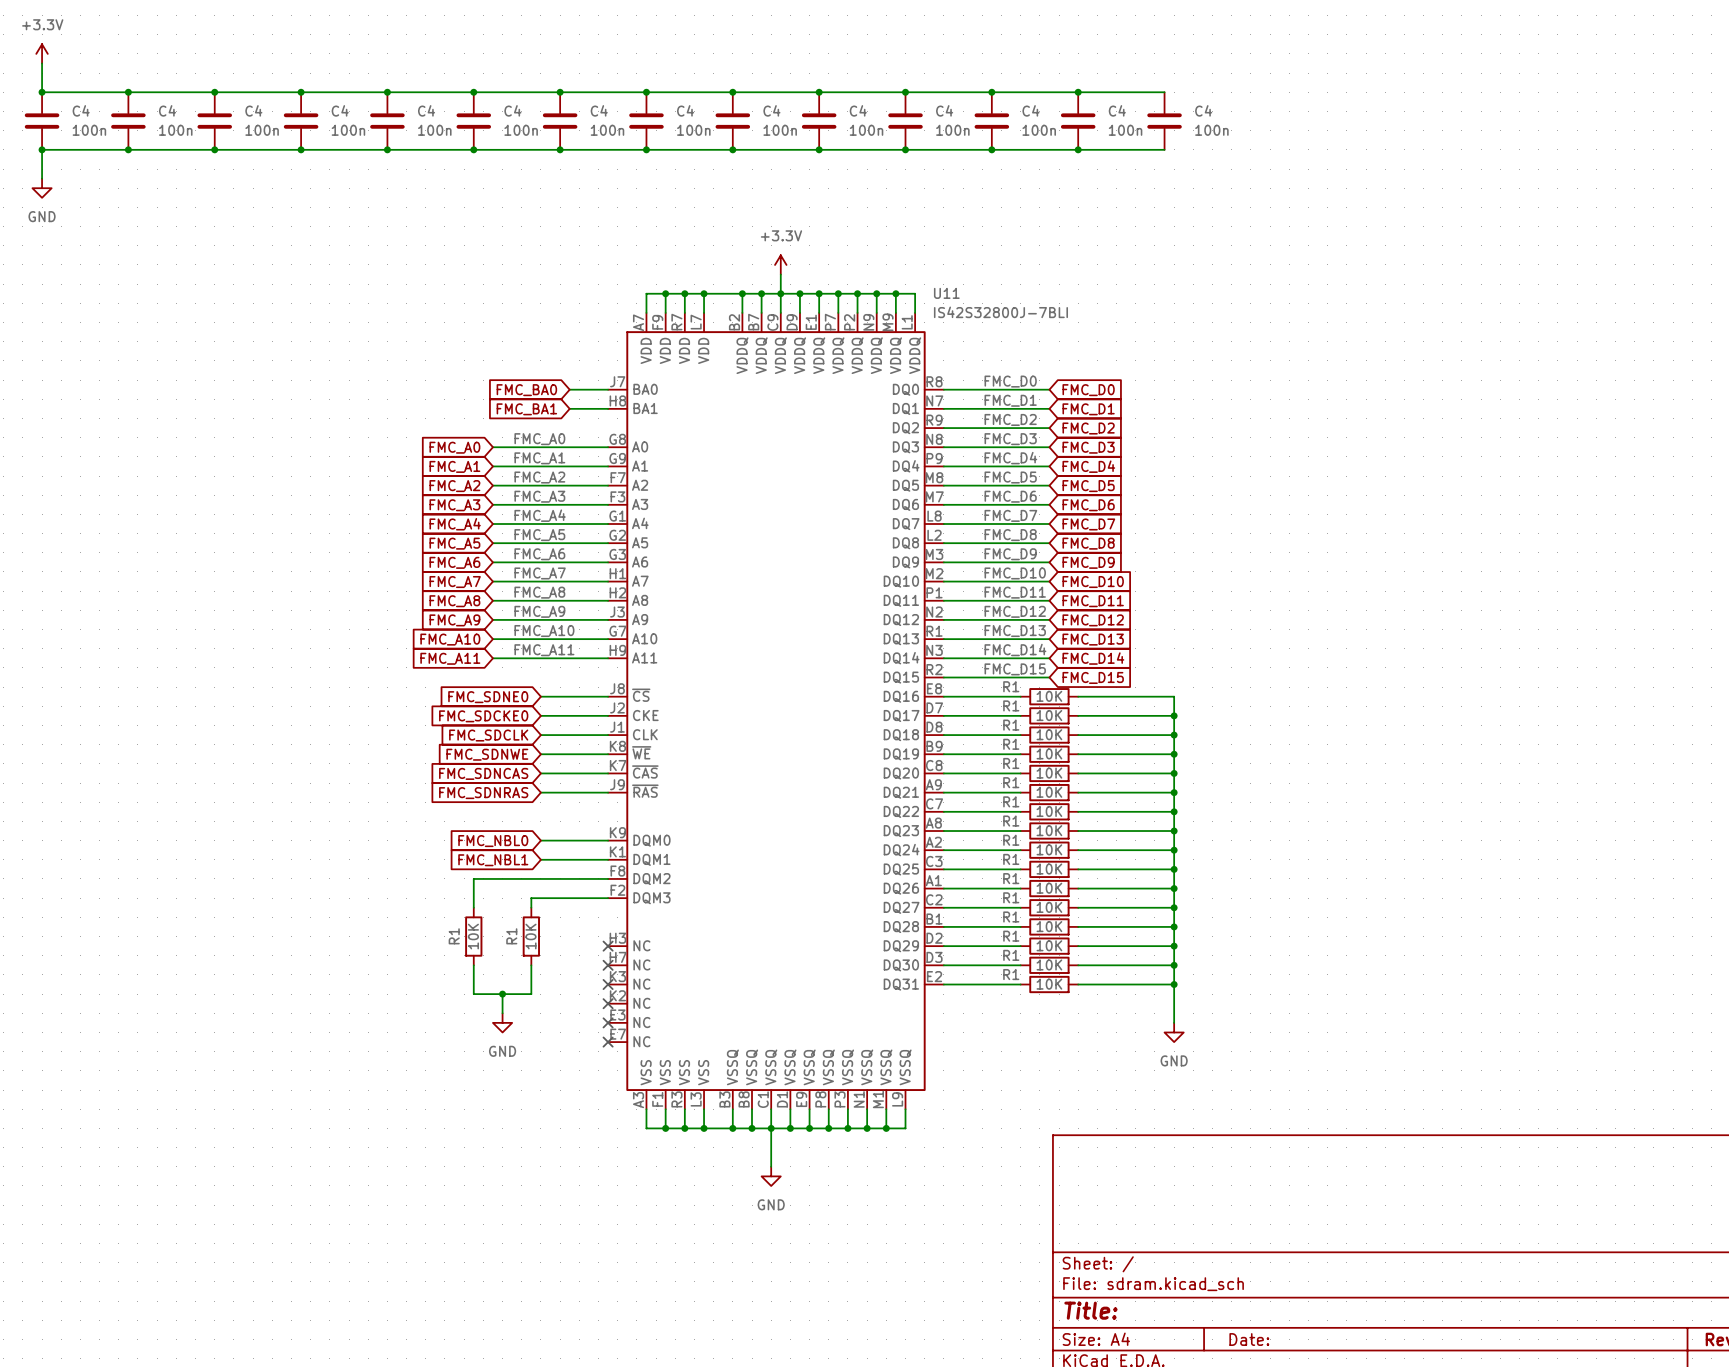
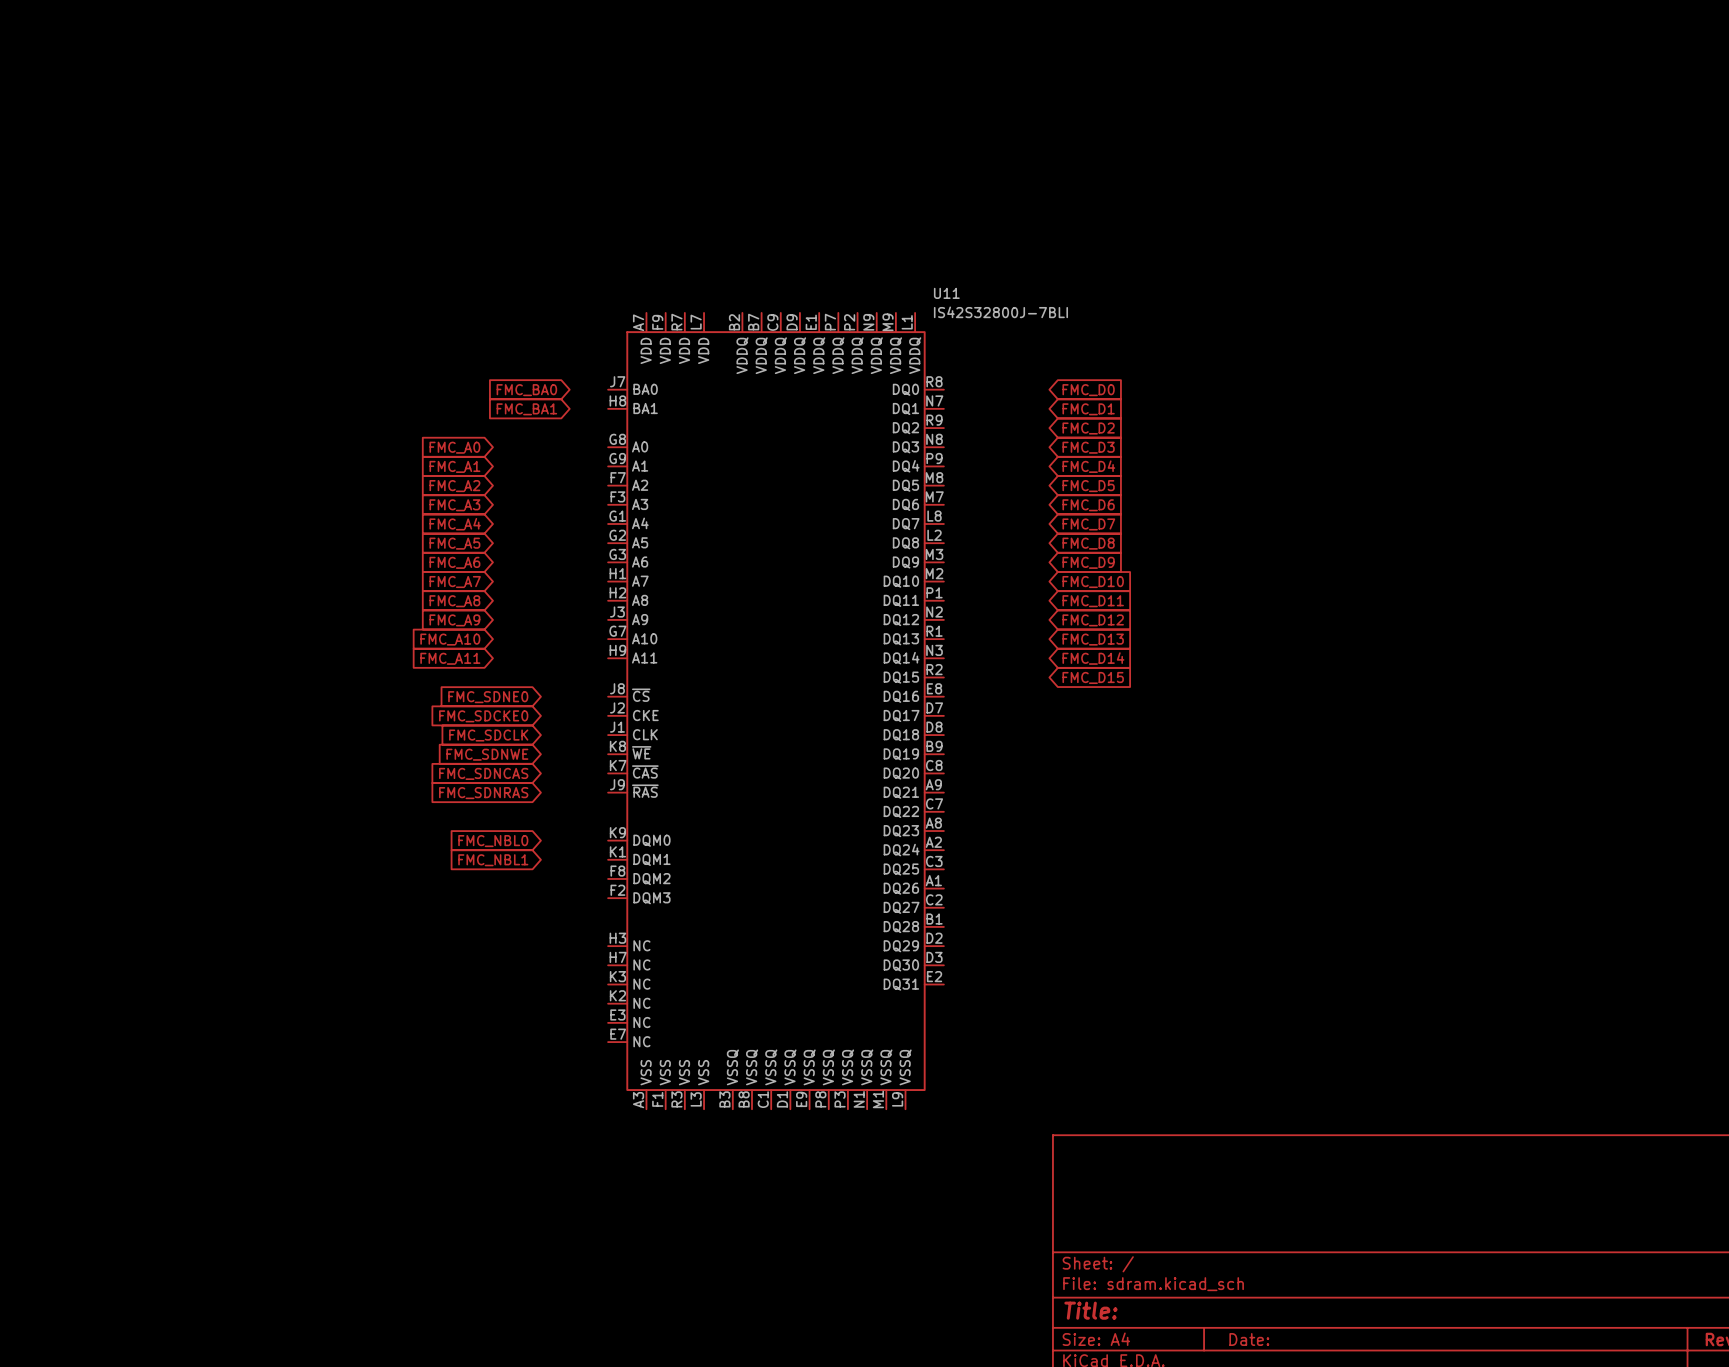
power symbol: +3.3V (42, 53) -> none
wire: (42, 63) (42, 92) (1164, 92) -> none
junction: (42, 92) -> none
junction: (128, 92) -> none
junction: (214, 92) -> none
junction: (301, 92) -> none
junction: (387, 92) -> none
junction: (473, 92) -> none
junction: (560, 92) -> none
junction: (646, 92) -> none
junction: (732, 92) -> none
junction: (819, 92) -> none
junction: (905, 92) -> none
junction: (991, 92) -> none
junction: (1078, 92) -> none
C4: 100n (42, 121) -> none
C4: 100n (128, 121) -> none
C4: 100n (214, 121) -> none
C4: 100n (301, 121) -> none
C4: 100n (387, 121) -> none
C4: 100n (473, 121) -> none
C4: 100n (560, 121) -> none
C4: 100n (646, 121) -> none
C4: 100n (732, 121) -> none
C4: 100n (819, 121) -> none
C4: 100n (905, 121) -> none
C4: 100n (991, 121) -> none
C4: 100n (1078, 121) -> none
C4: 100n (1164, 121) -> none
junction: (42, 149) -> none
junction: (128, 149) -> none
junction: (214, 149) -> none
junction: (301, 149) -> none
junction: (387, 149) -> none
junction: (473, 149) -> none
junction: (560, 149) -> none
junction: (646, 149) -> none
junction: (732, 149) -> none
junction: (819, 149) -> none
junction: (905, 149) -> none
junction: (991, 149) -> none
junction: (1078, 149) -> none
wire: (1164, 149) (42, 149) (42, 178) -> none
power symbol: GND (42, 188) -> none
power symbol: +3.3V (780, 264) -> none
wire: (780, 274) (780, 312) -> none
wire: (665, 293) (665, 312) -> none
junction: (665, 293) -> none
wire: (684, 293) (684, 312) -> none
junction: (684, 293) -> none
wire: (704, 293) (704, 312) -> none
junction: (704, 293) -> none
wire: (742, 293) (742, 312) -> none
junction: (742, 293) -> none
wire: (761, 293) (761, 312) -> none
junction: (761, 293) -> none
junction: (780, 293) -> none
wire: (799, 293) (799, 312) -> none
junction: (799, 293) -> none
wire: (819, 293) (819, 312) -> none
junction: (819, 293) -> none
wire: (838, 293) (838, 312) -> none
junction: (838, 293) -> none
wire: (857, 293) (857, 312) -> none
junction: (857, 293) -> none
wire: (876, 293) (876, 312) -> none
junction: (876, 293) -> none
wire: (895, 293) (895, 312) -> none
junction: (895, 293) -> none
wire: (646, 312) (646, 293) (915, 293) (915, 312) -> none
label: FMC_D0 (1010, 381) -> none
wire: (569, 389) (608, 389) -> none
wire: (943, 389) (1049, 389) -> none
label: FMC_D1 (1010, 400) -> none
wire: (569, 408) (608, 408) -> none
wire: (943, 408) (1049, 408) -> none
label: FMC_D2 (1010, 419) -> none
wire: (943, 428) (1049, 428) -> none
label: FMC_A0 (539, 439) -> none
label: FMC_D3 (1010, 439) -> none
wire: (492, 447) (608, 447) -> none
wire: (943, 447) (1049, 447) -> none
label: FMC_A1 (539, 458) -> none
label: FMC_D4 (1010, 458) -> none
wire: (492, 466) (608, 466) -> none
wire: (943, 466) (1049, 466) -> none
label: FMC_A2 (539, 477) -> none
label: FMC_D5 (1010, 477) -> none
wire: (492, 485) (608, 485) -> none
wire: (943, 485) (1049, 485) -> none
label: FMC_A3 (539, 496) -> none
label: FMC_D6 (1010, 496) -> none
wire: (492, 504) (608, 504) -> none
wire: (943, 504) (1049, 504) -> none
label: FMC_A4 (540, 515) -> none
label: FMC_D7 (1010, 515) -> none
wire: (492, 524) (608, 524) -> none
wire: (943, 524) (1049, 524) -> none
label: FMC_A5 (539, 535) -> none
label: FMC_D8 (1010, 535) -> none
wire: (492, 543) (608, 543) -> none
wire: (943, 543) (1049, 543) -> none
label: FMC_A6 (539, 554) -> none
label: FMC_D9 (1010, 554) -> none
wire: (492, 562) (608, 562) -> none
wire: (943, 562) (1049, 562) -> none
label: FMC_A7 (540, 573) -> none
label: FMC_D10 (1015, 573) -> none
wire: (492, 581) (608, 581) -> none
wire: (943, 581) (1049, 581) -> none
label: FMC_A8 (539, 592) -> none
label: FMC_D11 (1015, 592) -> none
wire: (492, 600) (608, 600) -> none
wire: (943, 600) (1049, 600) -> none
label: FMC_A9 (539, 611) -> none
label: FMC_D12 (1015, 611) -> none
wire: (492, 619) (608, 619) -> none
wire: (943, 619) (1049, 619) -> none
label: FMC_A10 (544, 631) -> none
label: FMC_D13 (1015, 631) -> none
wire: (492, 639) (608, 639) -> none
wire: (943, 639) (1049, 639) -> none
label: FMC_D14 (1015, 649) -> none
label: FMC_A11 (544, 650) -> none
wire: (492, 658) (608, 658) -> none
wire: (943, 658) (1049, 658) -> none
label: FMC_D15 (1015, 669) -> none
wire: (943, 677) (1049, 677) -> none
wire: (540, 696) (608, 696) -> none
wire: (943, 696) (1020, 696) -> none
R1: 10K (1049, 696) -> none
wire: (1078, 696) (1174, 696) (1174, 1022) -> none
wire: (540, 715) (608, 715) -> none
wire: (943, 715) (1020, 715) -> none
R1: 10K (1049, 715) -> none
wire: (1078, 715) (1174, 715) -> none
junction: (1174, 715) -> none
wire: (540, 735) (608, 735) -> none
wire: (943, 735) (1020, 735) -> none
R1: 10K (1049, 735) -> none
wire: (1078, 735) (1174, 735) -> none
junction: (1174, 735) -> none
wire: (540, 754) (608, 754) -> none
wire: (943, 754) (1020, 754) -> none
R1: 10K (1049, 754) -> none
wire: (1078, 754) (1174, 754) -> none
junction: (1174, 754) -> none
wire: (540, 773) (608, 773) -> none
wire: (943, 773) (1020, 773) -> none
R1: 10K (1049, 773) -> none
wire: (1078, 773) (1174, 773) -> none
junction: (1174, 773) -> none
wire: (540, 792) (608, 792) -> none
wire: (943, 792) (1020, 792) -> none
R1: 10K (1049, 792) -> none
wire: (1078, 792) (1174, 792) -> none
junction: (1174, 792) -> none
wire: (943, 811) (1020, 811) -> none
R1: 10K (1049, 811) -> none
wire: (1078, 811) (1174, 811) -> none
junction: (1174, 811) -> none
wire: (943, 831) (1020, 831) -> none
R1: 10K (1049, 831) -> none
wire: (1078, 831) (1174, 831) -> none
junction: (1174, 831) -> none
wire: (540, 840) (608, 840) -> none
wire: (943, 850) (1020, 850) -> none
R1: 10K (1049, 850) -> none
wire: (1078, 850) (1174, 850) -> none
junction: (1174, 850) -> none
wire: (540, 859) (608, 859) -> none
wire: (943, 869) (1020, 869) -> none
R1: 10K (1049, 869) -> none
wire: (1078, 869) (1174, 869) -> none
junction: (1174, 869) -> none
wire: (608, 878) (473, 878) (473, 907) -> none
wire: (943, 888) (1020, 888) -> none
R1: 10K (1049, 888) -> none
wire: (1078, 888) (1174, 888) -> none
junction: (1174, 888) -> none
wire: (608, 898) (531, 898) (531, 907) -> none
wire: (943, 907) (1020, 907) -> none
R1: 10K (1049, 907) -> none
wire: (1078, 907) (1174, 907) -> none
junction: (1174, 907) -> none
wire: (943, 926) (1020, 926) -> none
R1: 10K (1049, 926) -> none
wire: (1078, 926) (1174, 926) -> none
junction: (1174, 926) -> none
R1: 10K (473, 936) -> none
R1: 10K (531, 936) -> none
no-connect mark: (608, 946) -> none
wire: (943, 946) (1020, 946) -> none
R1: 10K (1049, 946) -> none
wire: (1078, 946) (1174, 946) -> none
junction: (1174, 946) -> none
wire: (473, 965) (473, 994) (531, 994) (531, 965) -> none
no-connect mark: (608, 965) -> none
wire: (943, 965) (1020, 965) -> none
R1: 10K (1049, 965) -> none
wire: (1078, 965) (1174, 965) -> none
junction: (1174, 965) -> none
no-connect mark: (608, 984) -> none
wire: (943, 984) (1020, 984) -> none
R1: 10K (1049, 984) -> none
wire: (1078, 984) (1174, 984) -> none
junction: (1174, 984) -> none
wire: (502, 994) (502, 1013) -> none
junction: (502, 994) -> none
no-connect mark: (608, 1003) -> none
power symbol: GND (502, 1022) -> none
no-connect mark: (608, 1022) -> none
power symbol: GND (1174, 1032) -> none
no-connect mark: (608, 1042) -> none
wire: (646, 1109) (646, 1128) (905, 1128) (905, 1109) -> none
wire: (665, 1109) (665, 1128) -> none
wire: (684, 1109) (684, 1128) -> none
wire: (704, 1109) (704, 1128) -> none
wire: (732, 1109) (732, 1128) -> none
wire: (752, 1109) (752, 1128) -> none
wire: (771, 1109) (771, 1166) -> none
wire: (790, 1109) (790, 1128) -> none
wire: (809, 1109) (809, 1128) -> none
wire: (828, 1109) (828, 1128) -> none
wire: (847, 1109) (847, 1128) -> none
wire: (867, 1109) (867, 1128) -> none
wire: (886, 1109) (886, 1128) -> none
junction: (665, 1128) -> none
junction: (684, 1128) -> none
junction: (704, 1128) -> none
junction: (732, 1128) -> none
junction: (752, 1128) -> none
junction: (771, 1128) -> none
junction: (790, 1128) -> none
junction: (809, 1128) -> none
junction: (828, 1128) -> none
junction: (847, 1128) -> none
junction: (867, 1128) -> none
junction: (886, 1128) -> none
power symbol: GND (771, 1176) -> none

